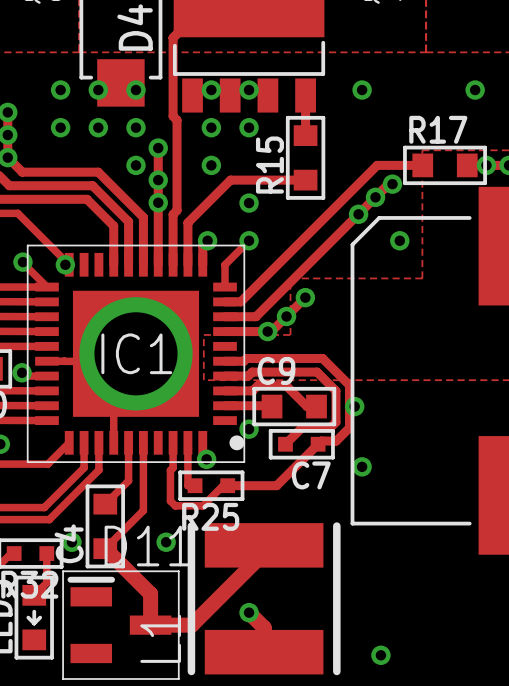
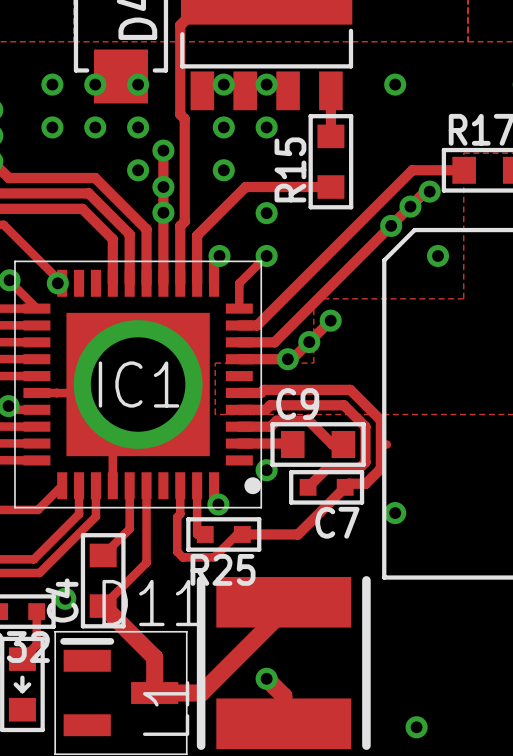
via: (354, 406) -> none
via: (166, 542) -> none

